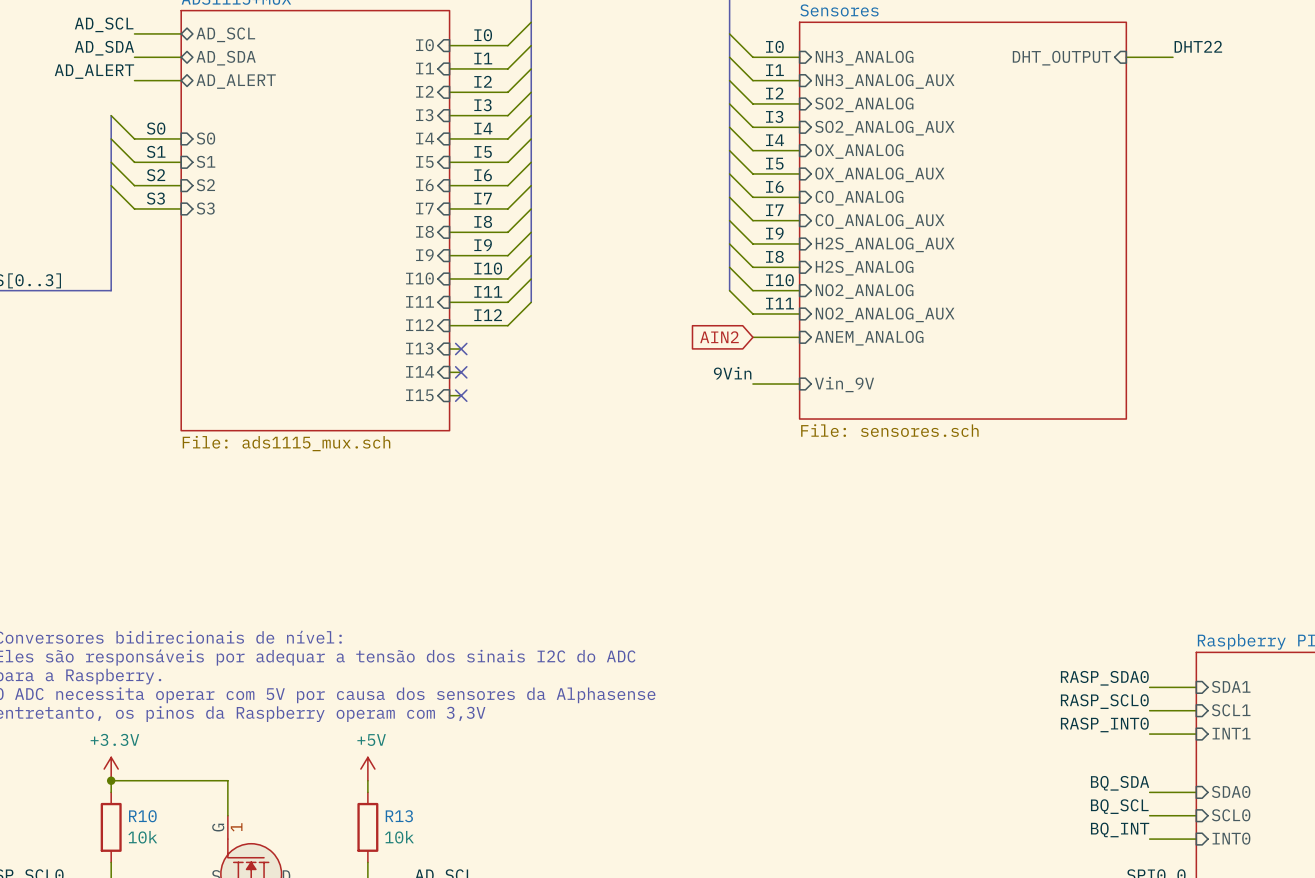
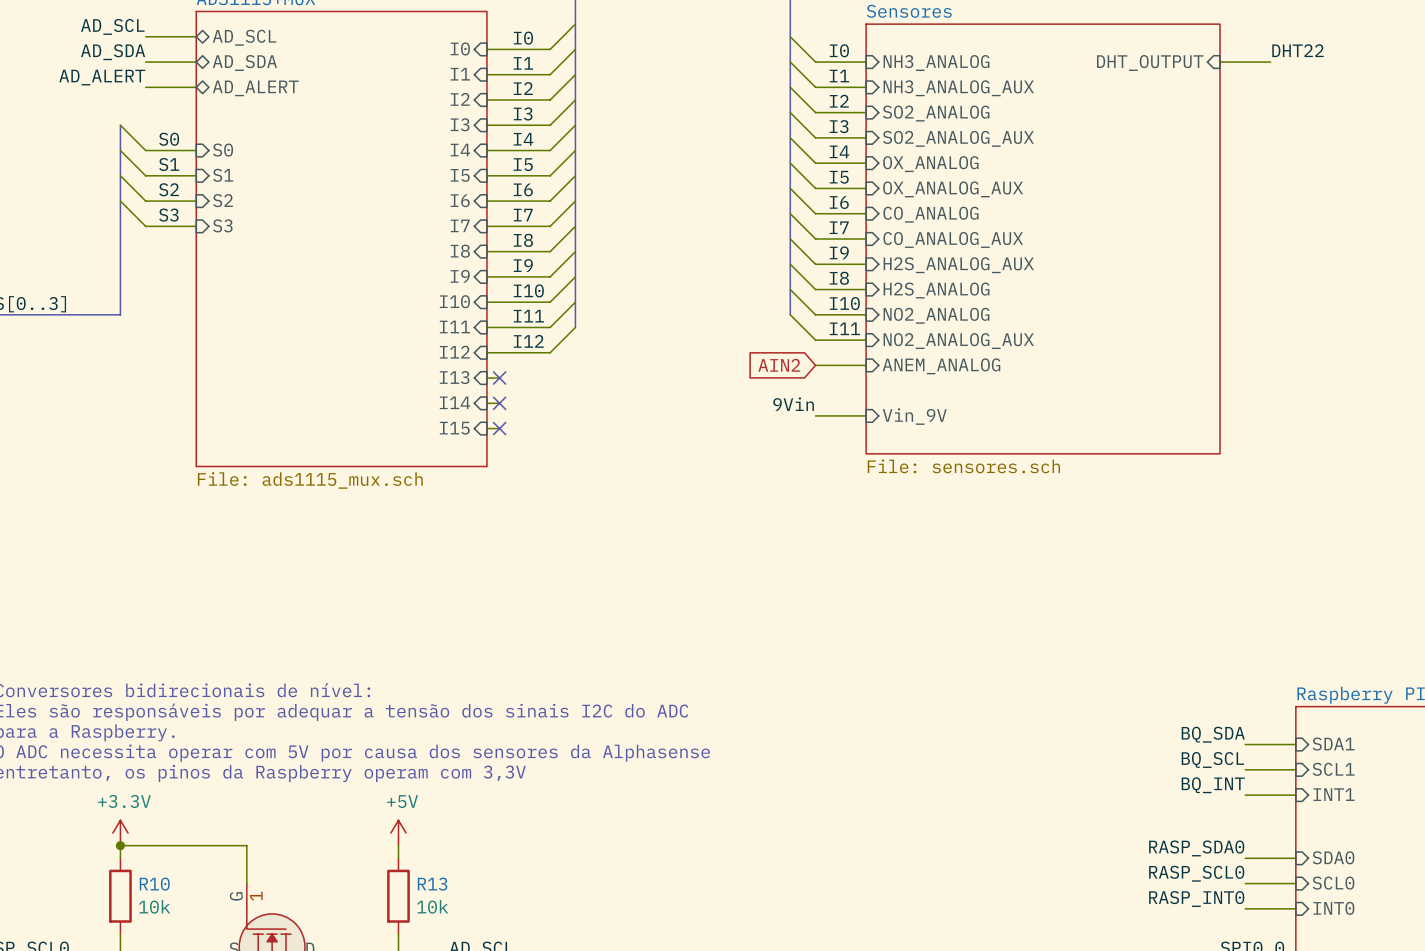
label: RASP_SDA0 (1104, 678) -> BQ_SDA (1213, 734)
label: RASP_SCL0 (1104, 701) -> BQ_SCL (1212, 759)
label: RASP_INT0 (1104, 724) -> BQ_INT (1213, 785)
label: BQ_SDA (1120, 783) -> RASP_SDA0 (1196, 848)
label: BQ_SCL (1119, 806) -> RASP_SCL0 (1196, 873)
label: BQ_INT (1120, 829) -> RASP_INT0 (1196, 899)

